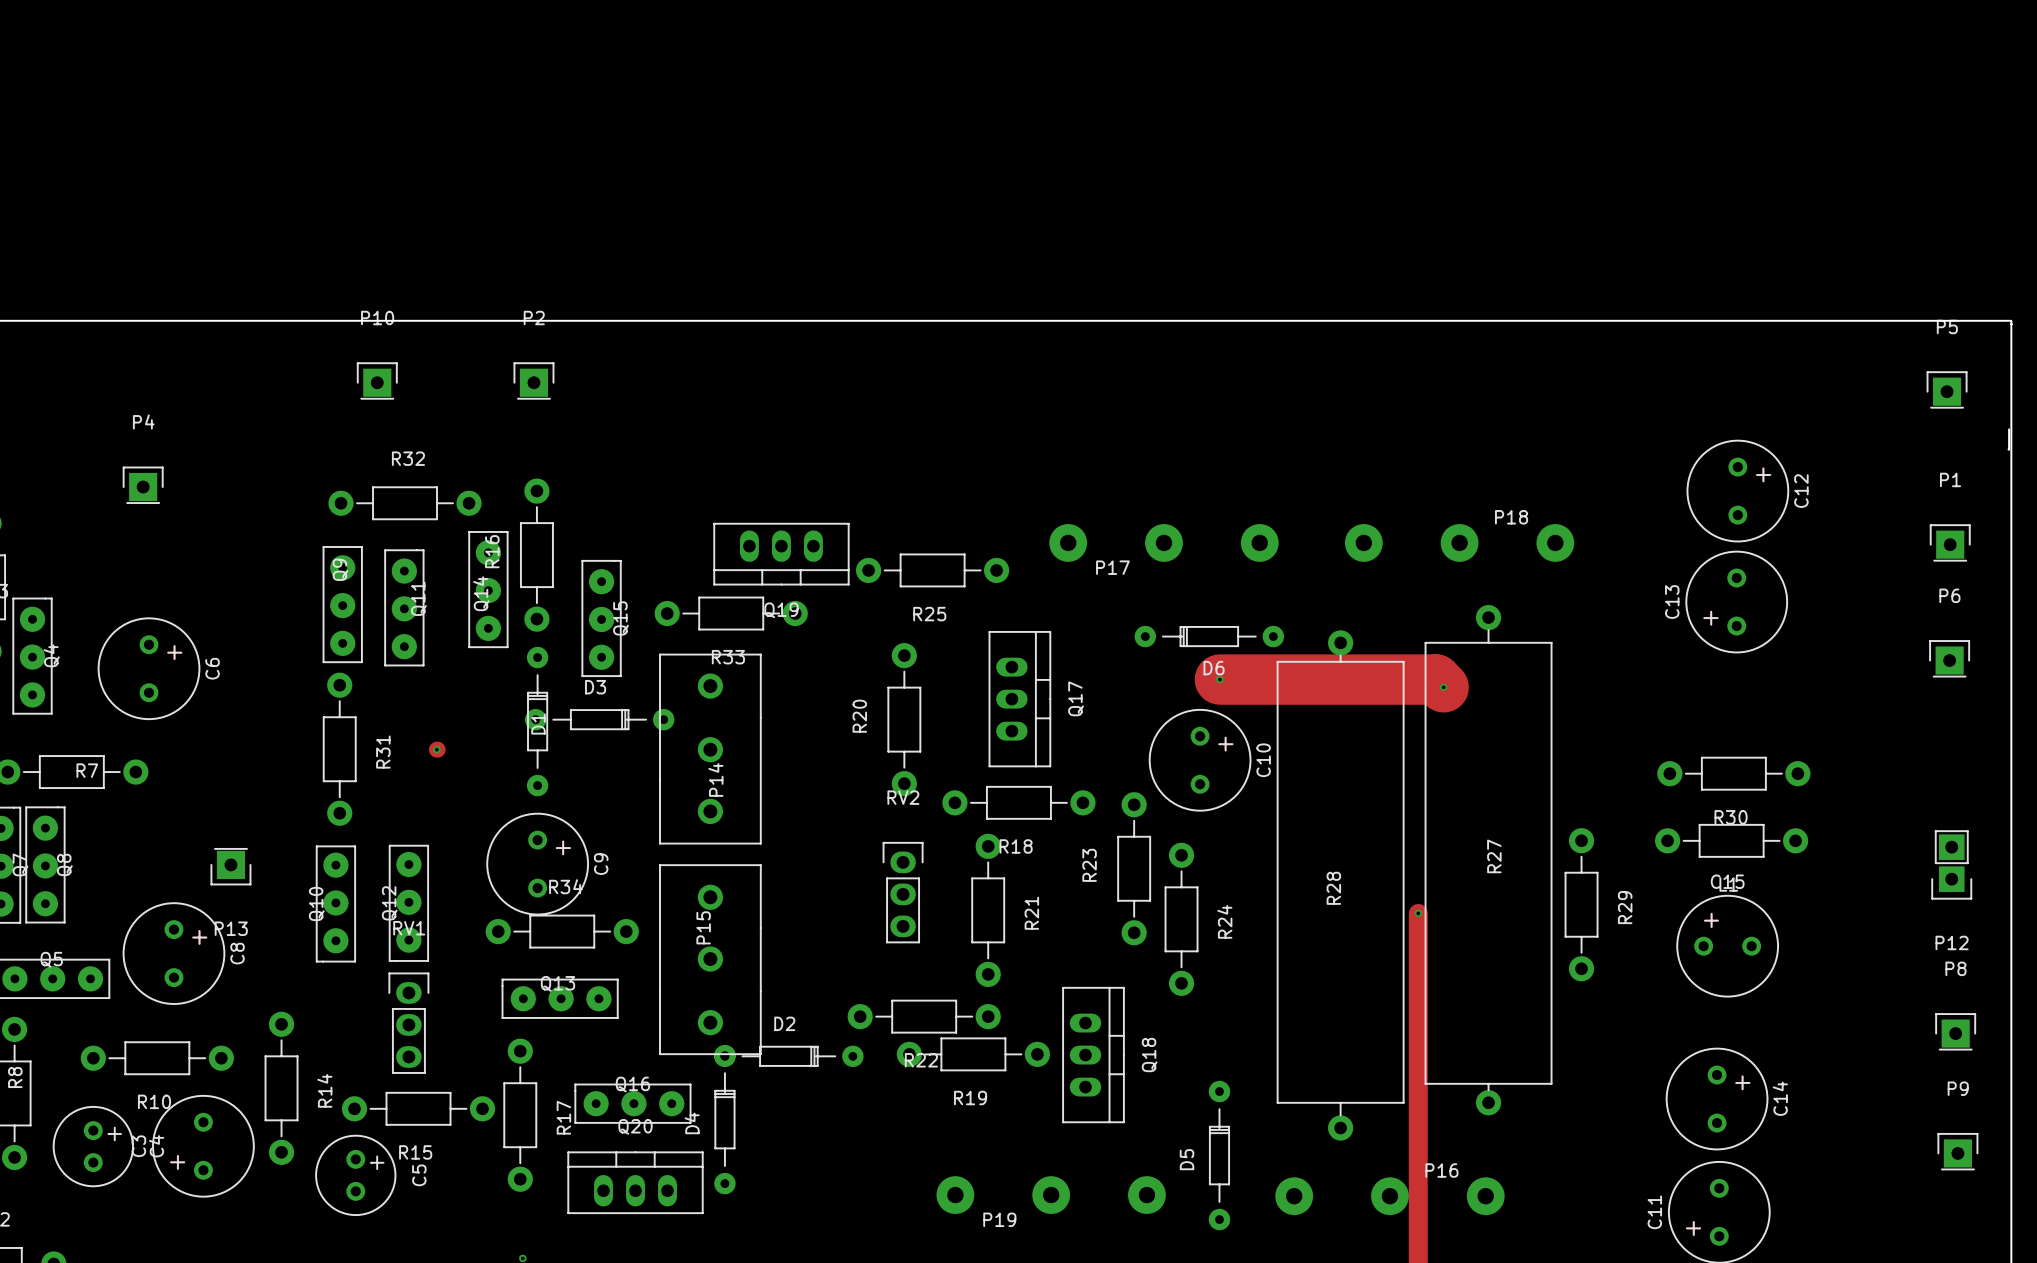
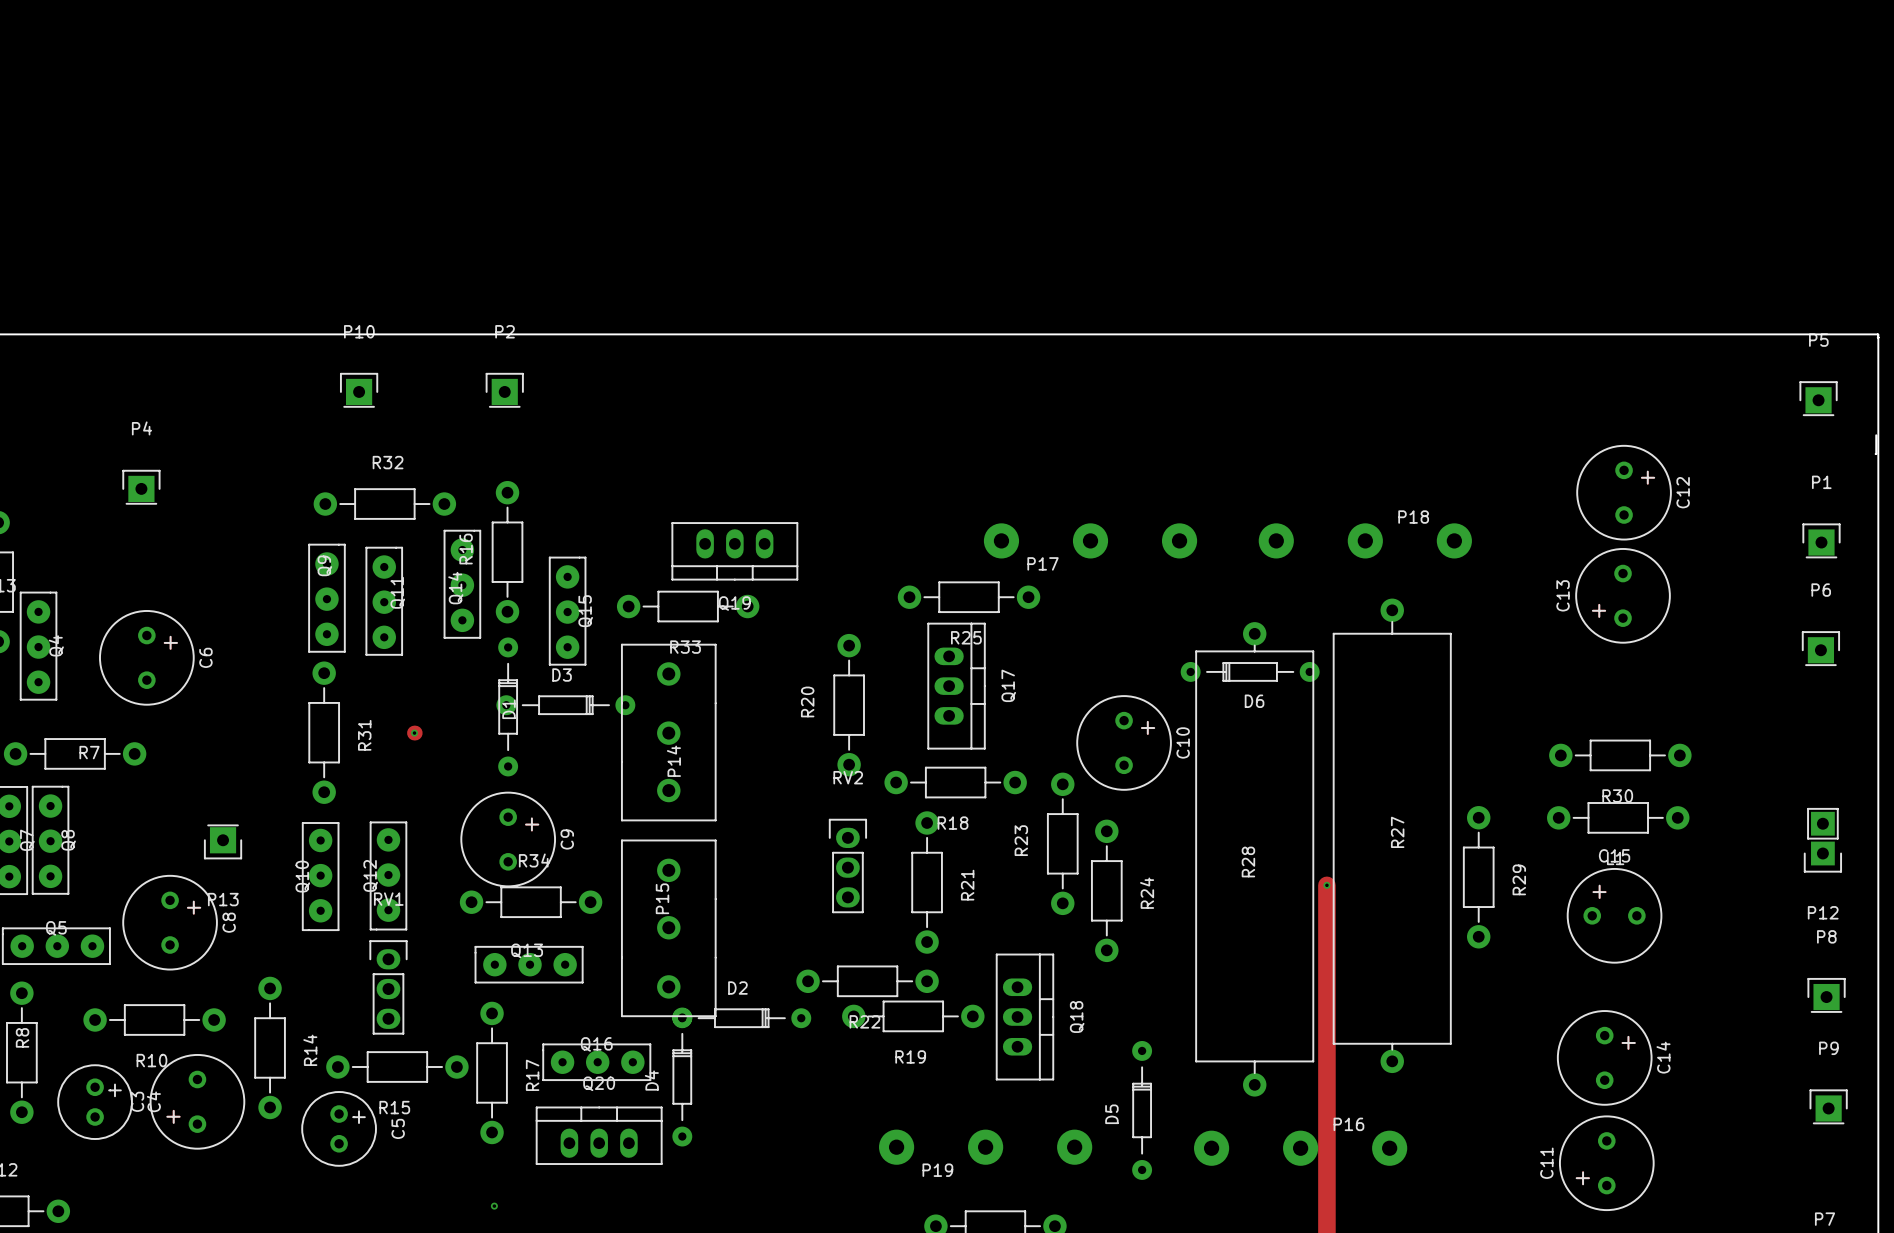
R25 position: (932, 570) -> (969, 597)
D6 position: (1209, 636) -> (1250, 671)
track: (1219, 679) (1435, 679) (1443, 687) -> none
via: (1219, 679) -> none
via: (1443, 687) -> none

